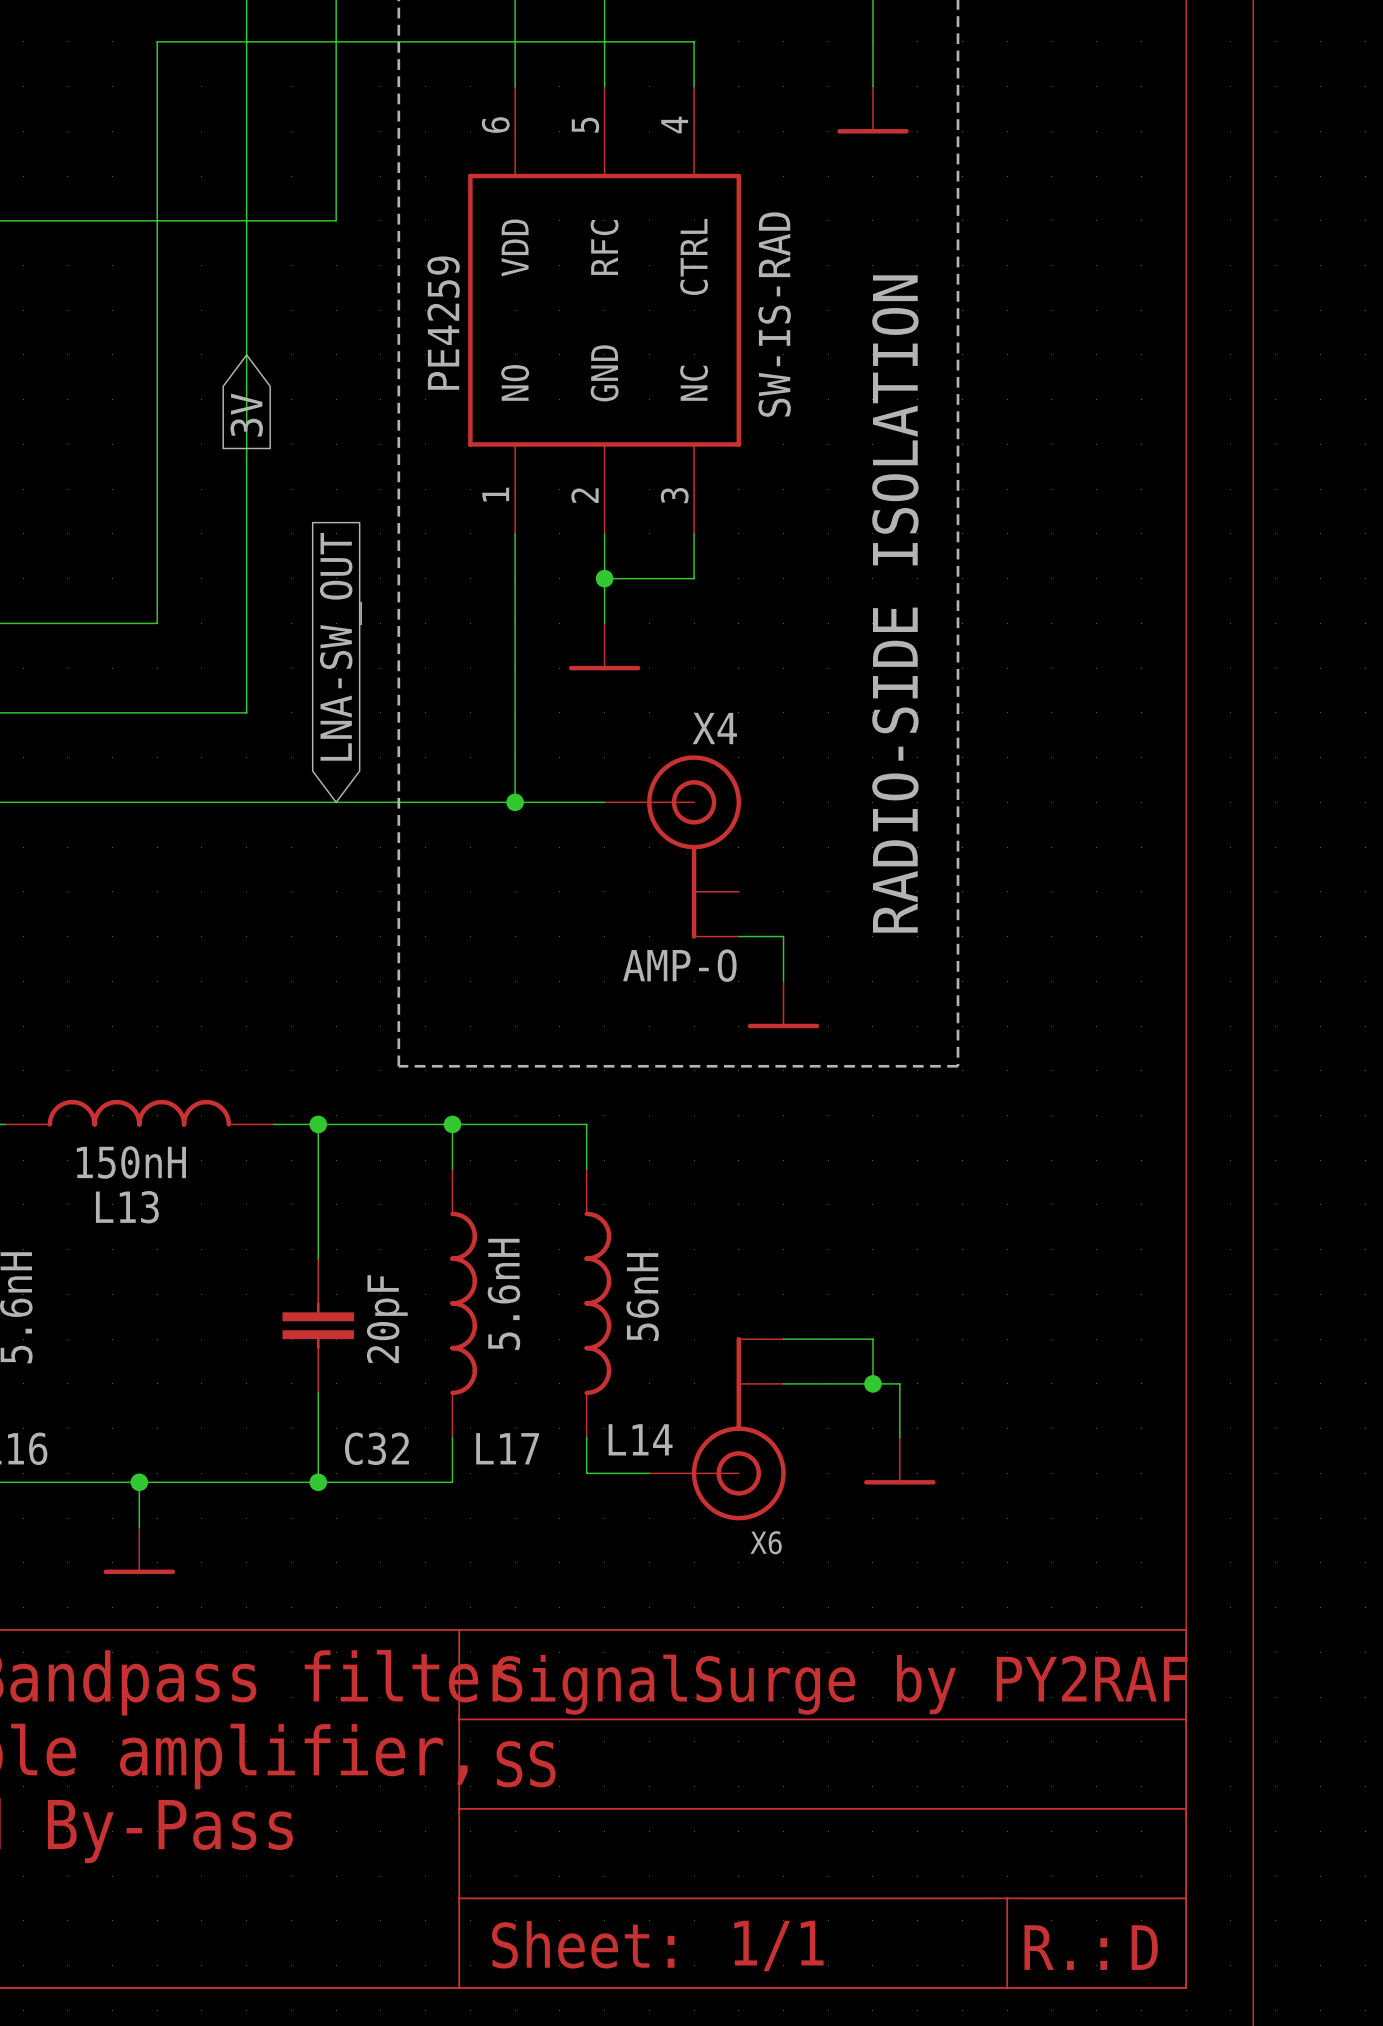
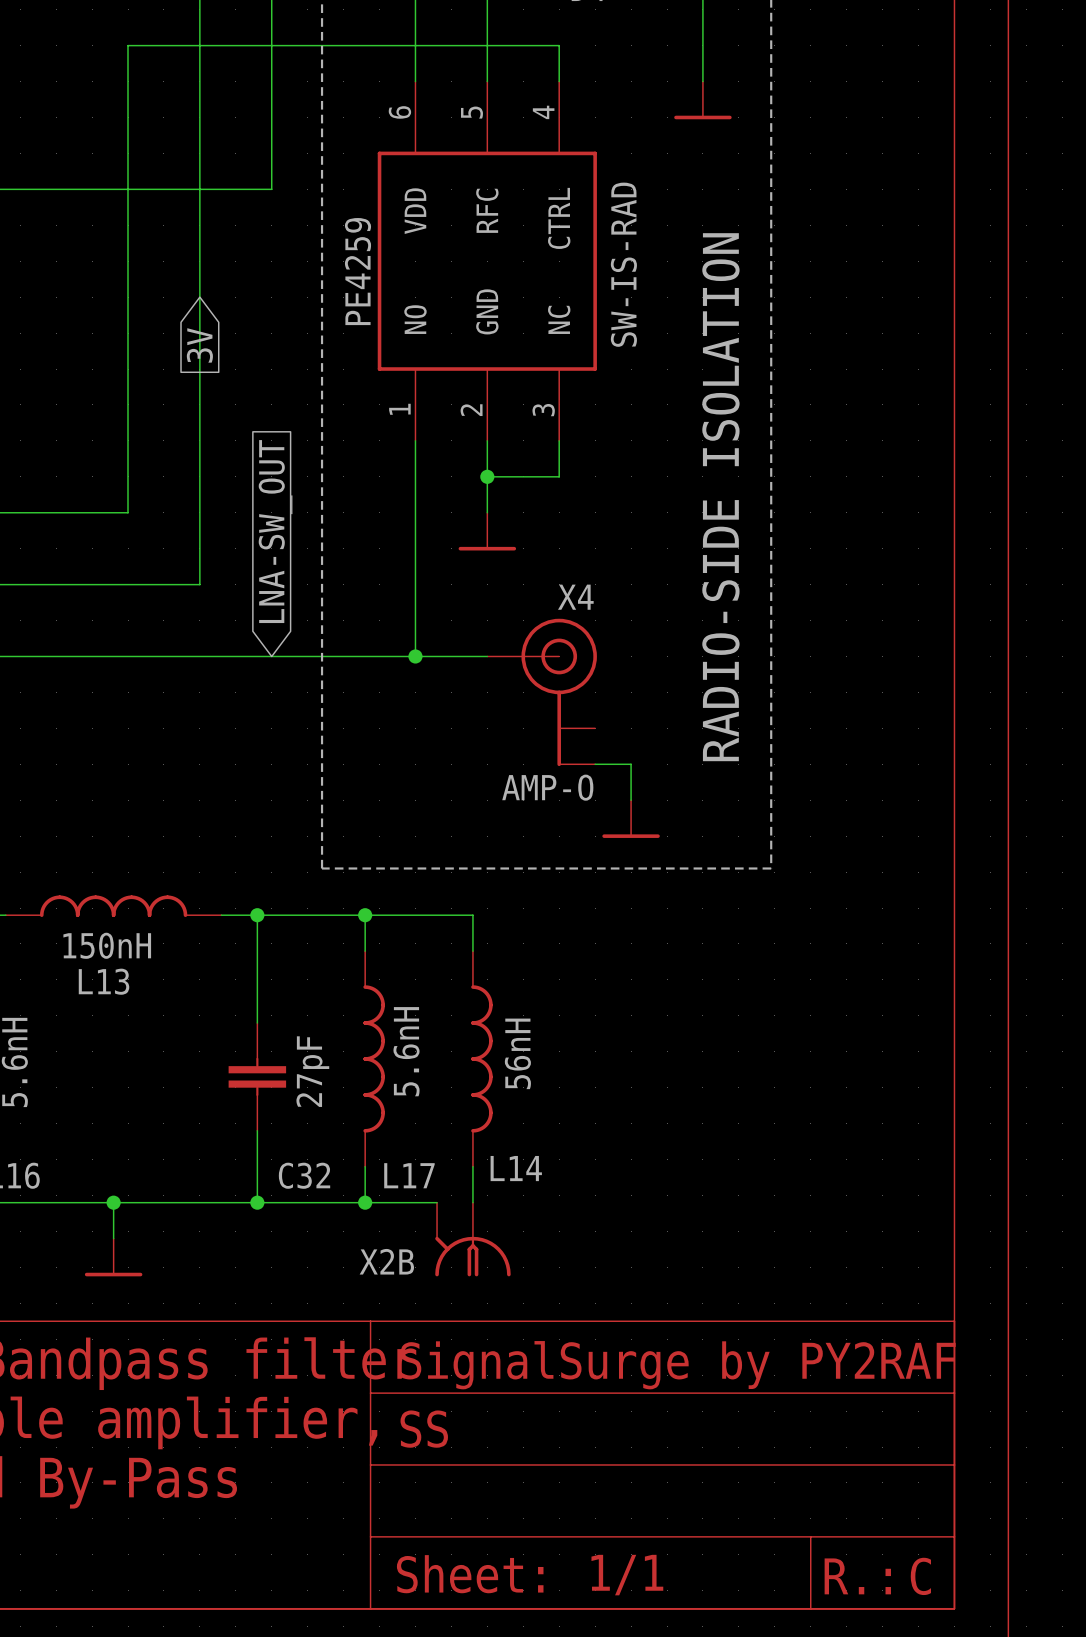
C32 value: 20pF (387, 1319) -> 27pF (312, 1071)
wire: (783, 1339) (872, 1339) (872, 1383) -> none
wire: (783, 1383) (899, 1383) (899, 1437) -> none
junction: (872, 1383) -> none
X6: (717, 1428) -> none
power symbol: (899, 1461) -> none
wire: (586, 1473) (649, 1473) -> (472, 1195) (472, 1202)
wire: none -> (365, 1202) (437, 1202)
junction: none -> (365, 1202)
X2B: none -> (472, 1239)
text: D (1144, 1947) -> C (920, 1576)

